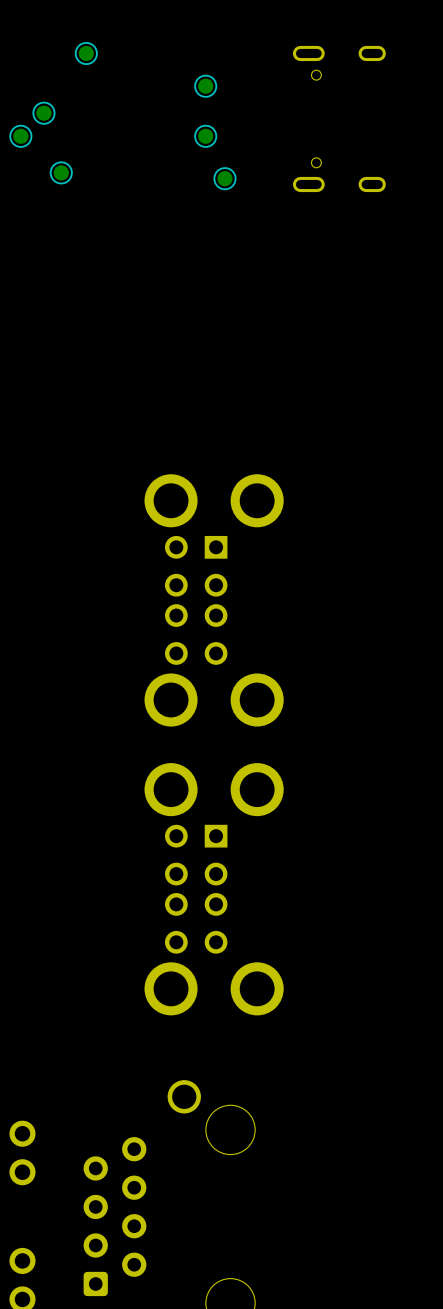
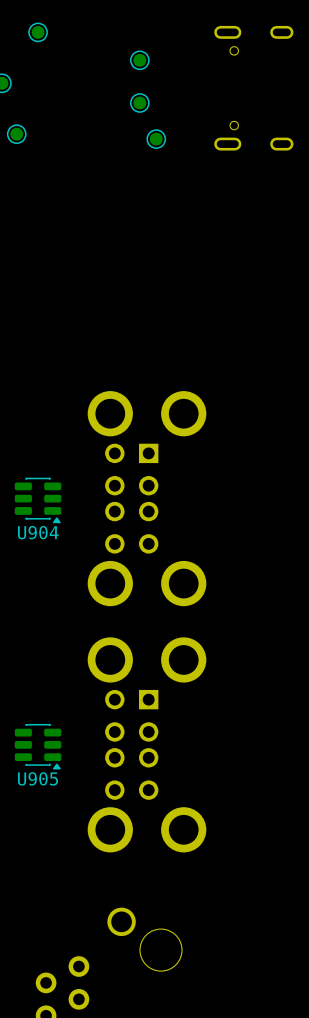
U904: none -> (38, 500)
U905: none -> (38, 746)

